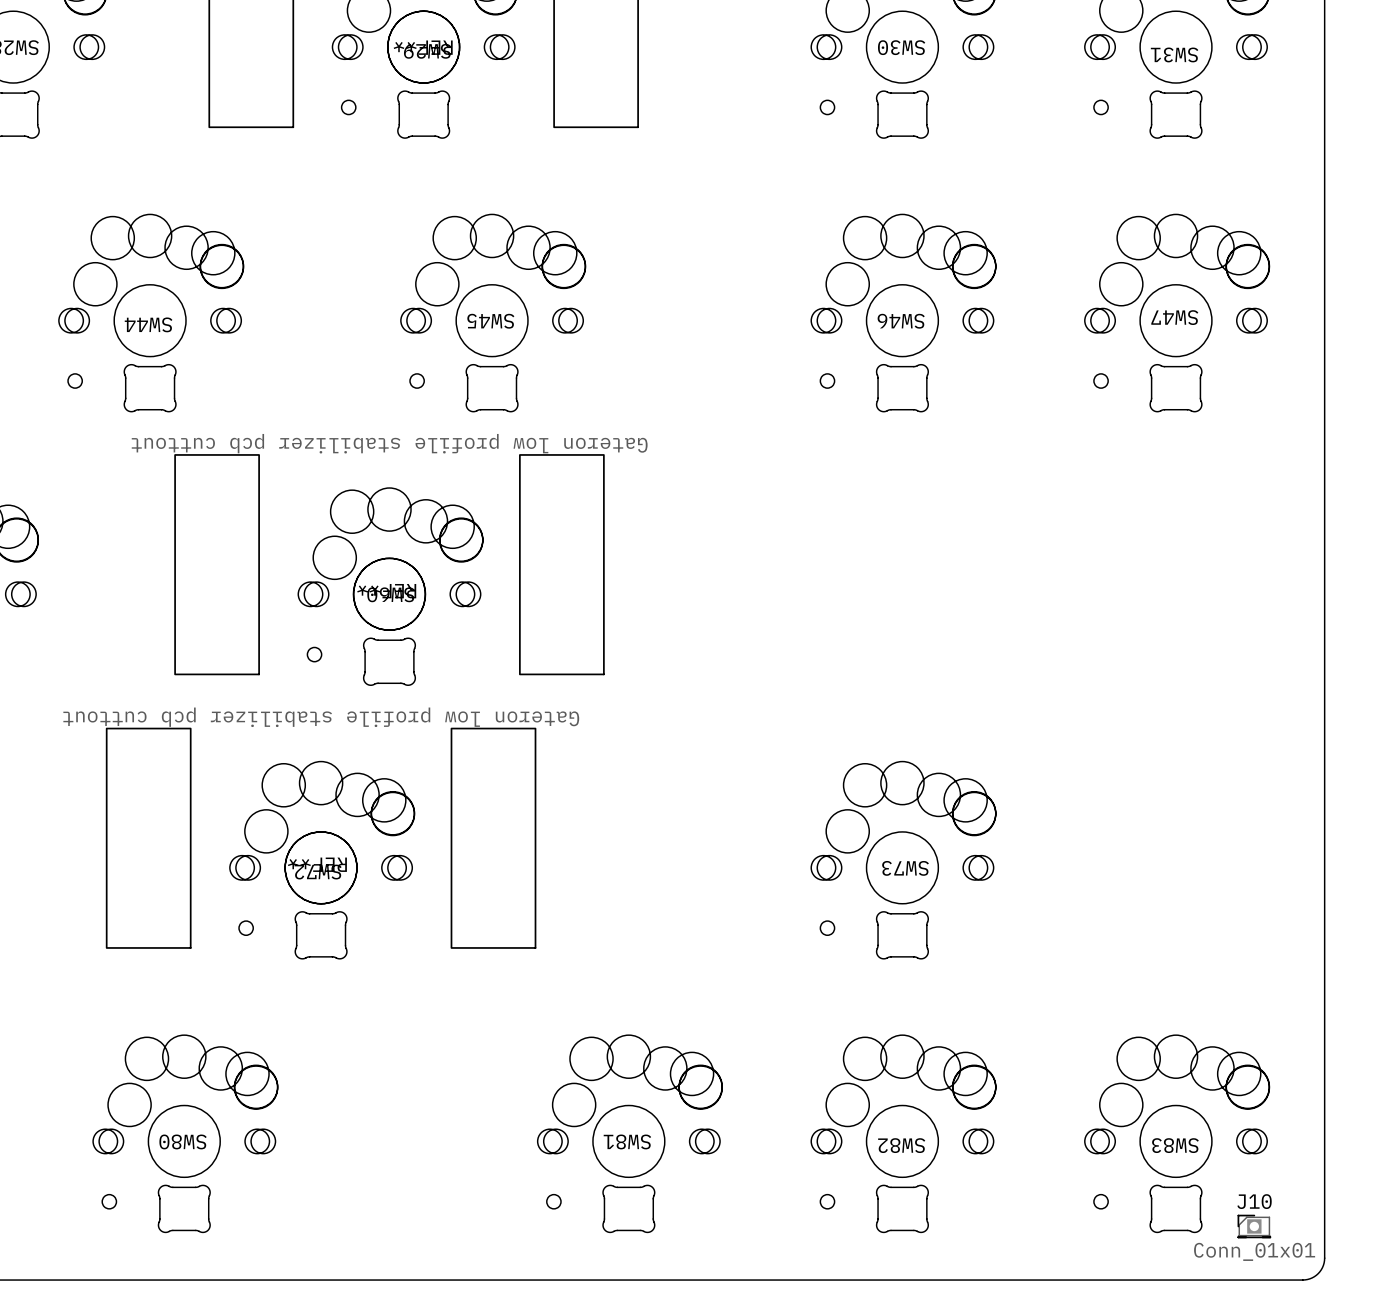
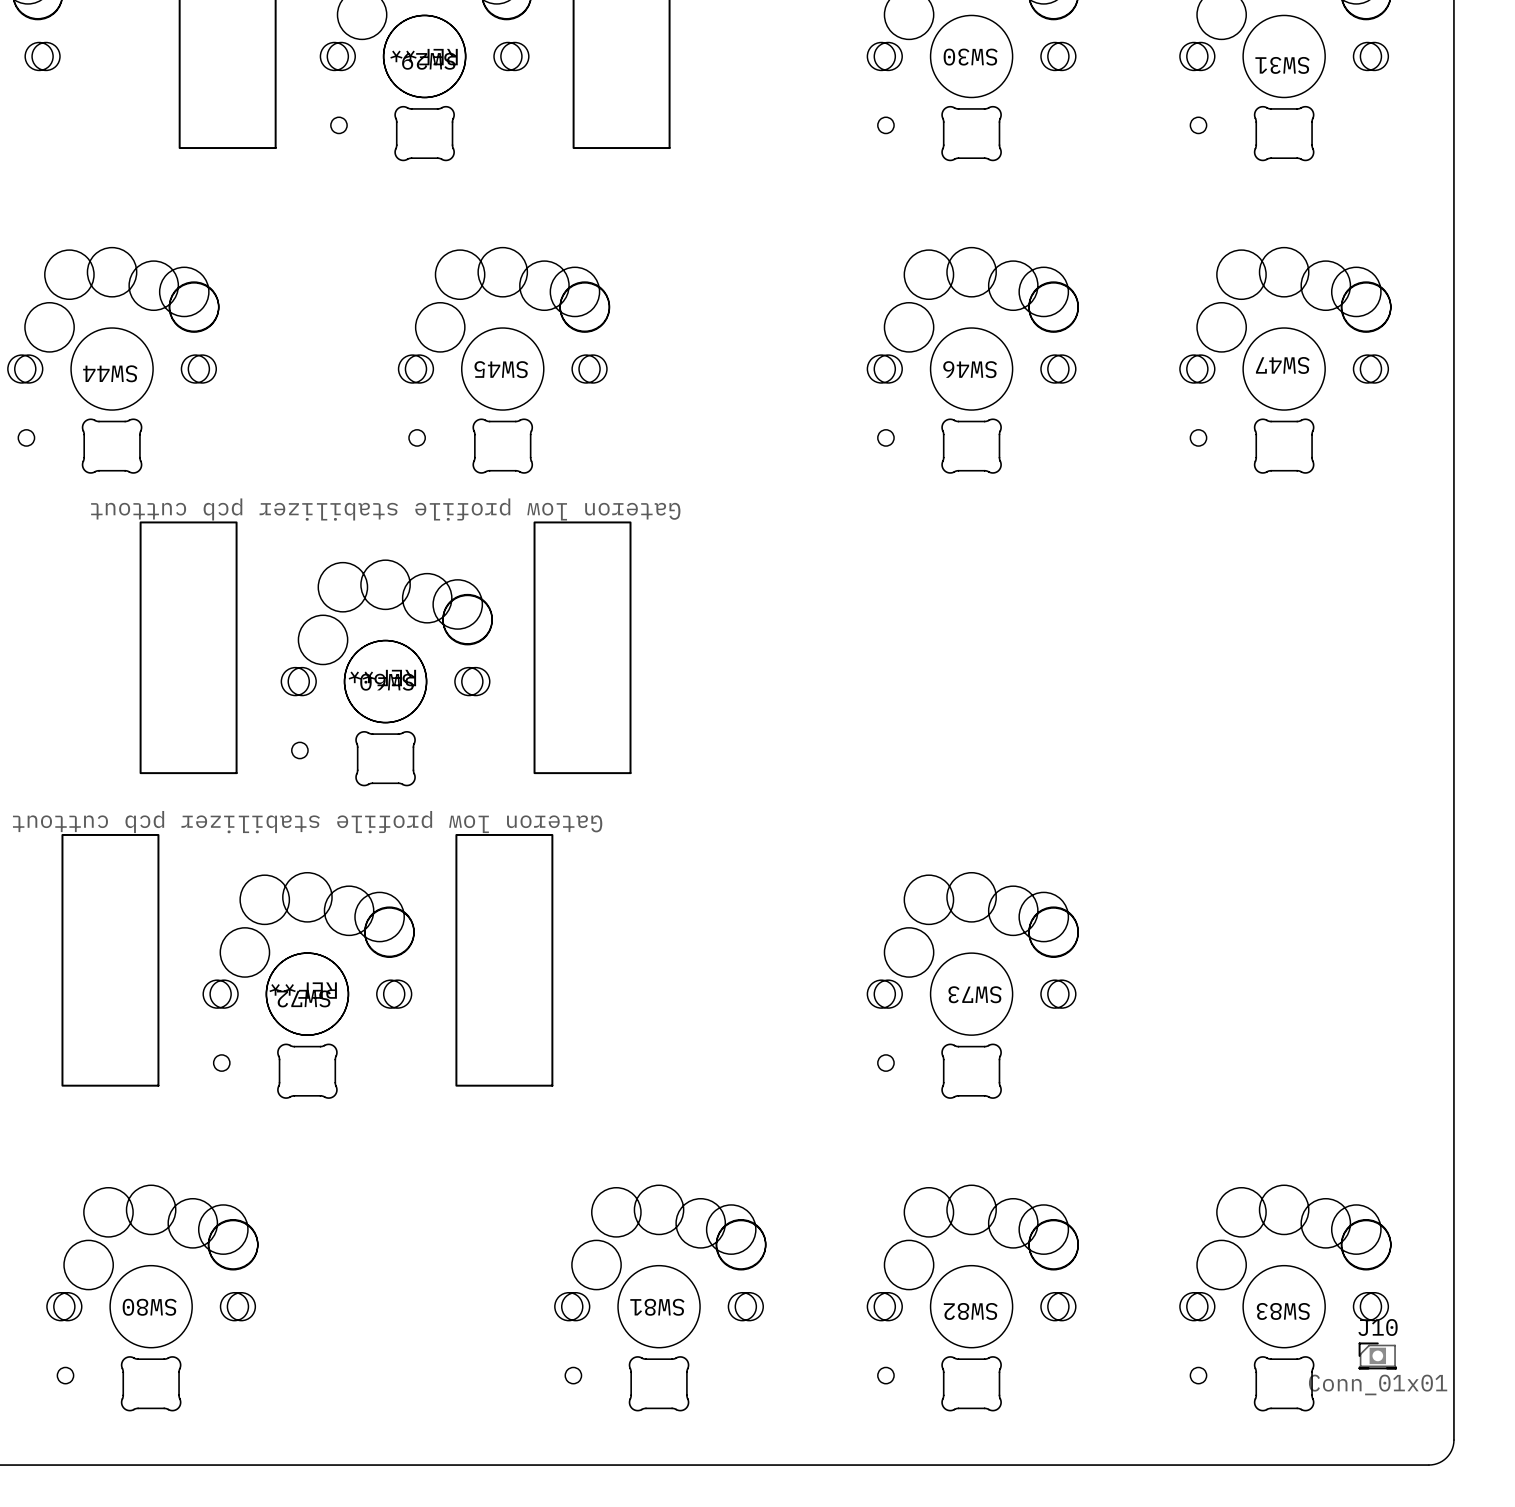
J10 position: (1254, 1226) -> (1377, 1355)

